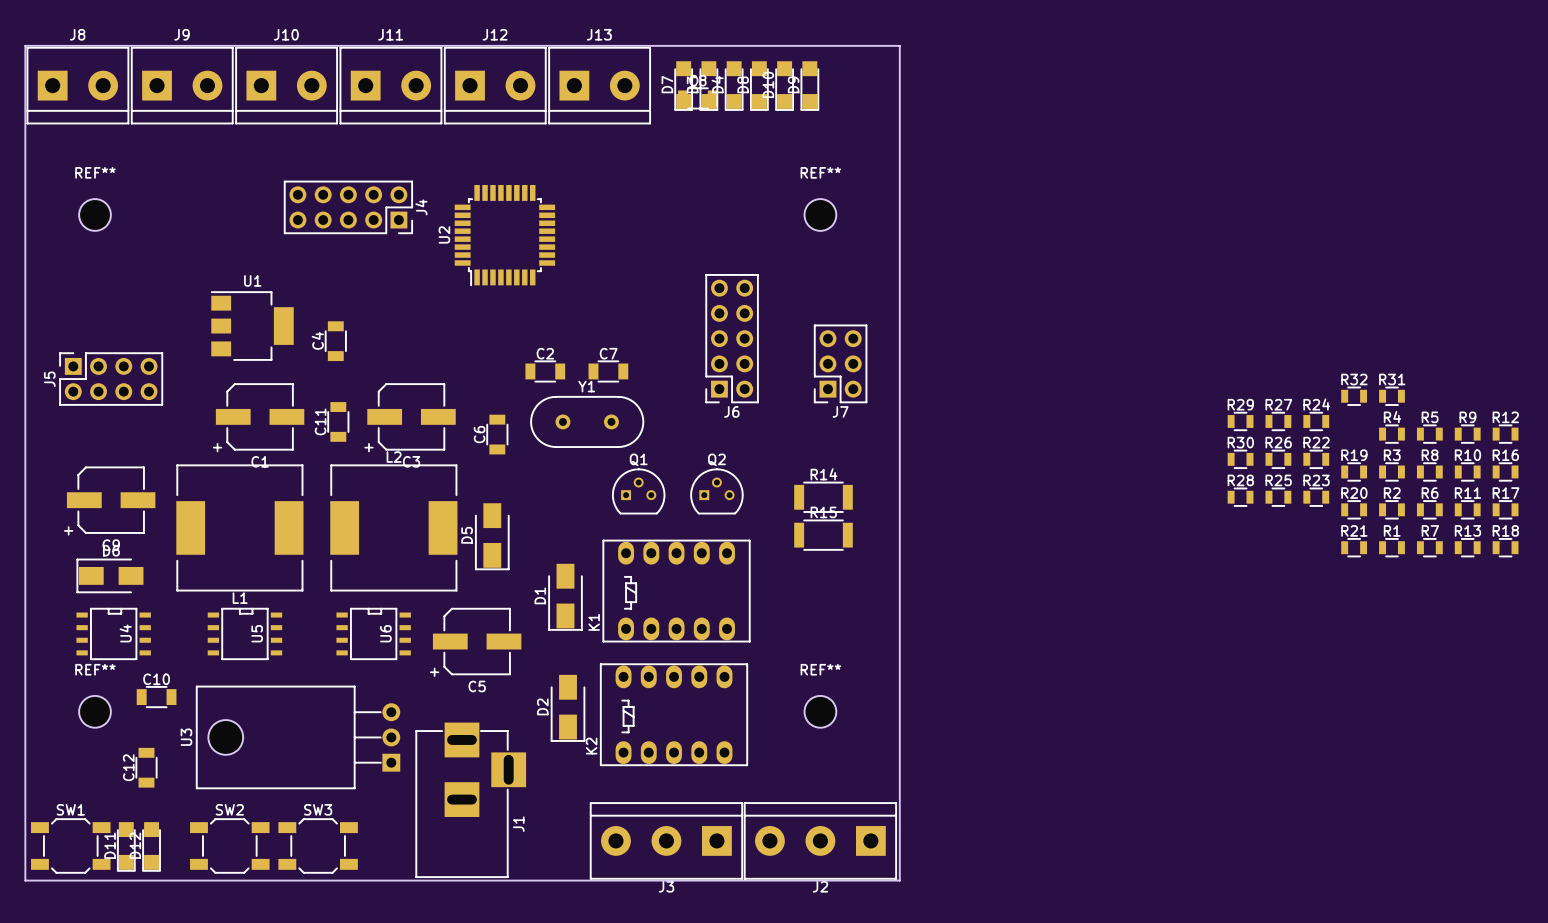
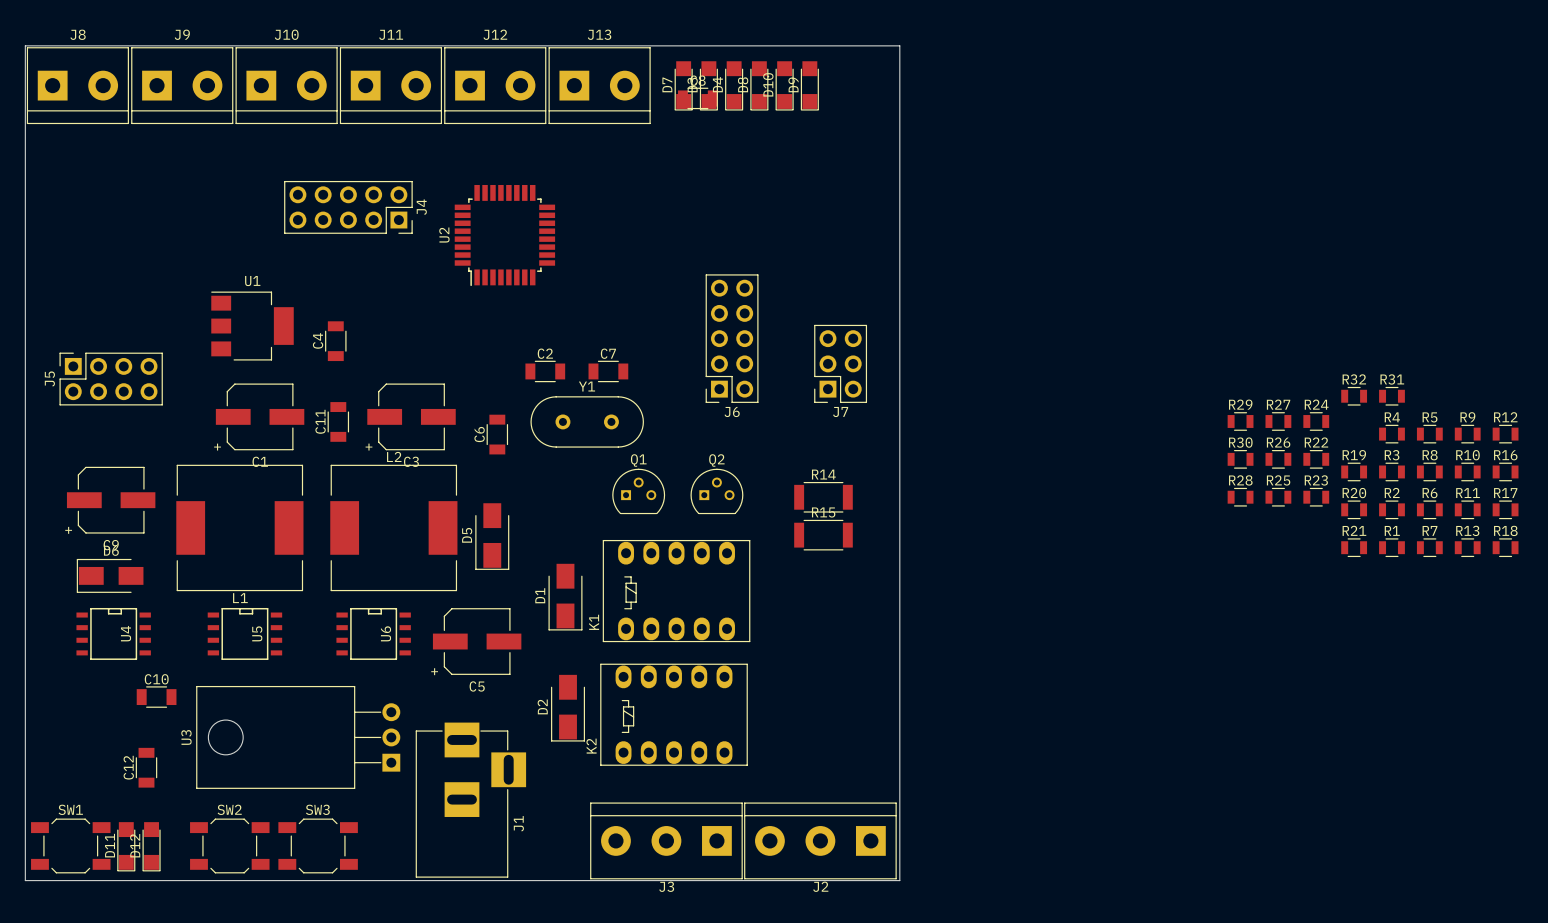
REF**: (95, 214) -> none
REF**: (820, 214) -> none
REF**: (95, 711) -> none
REF**: (820, 711) -> none

